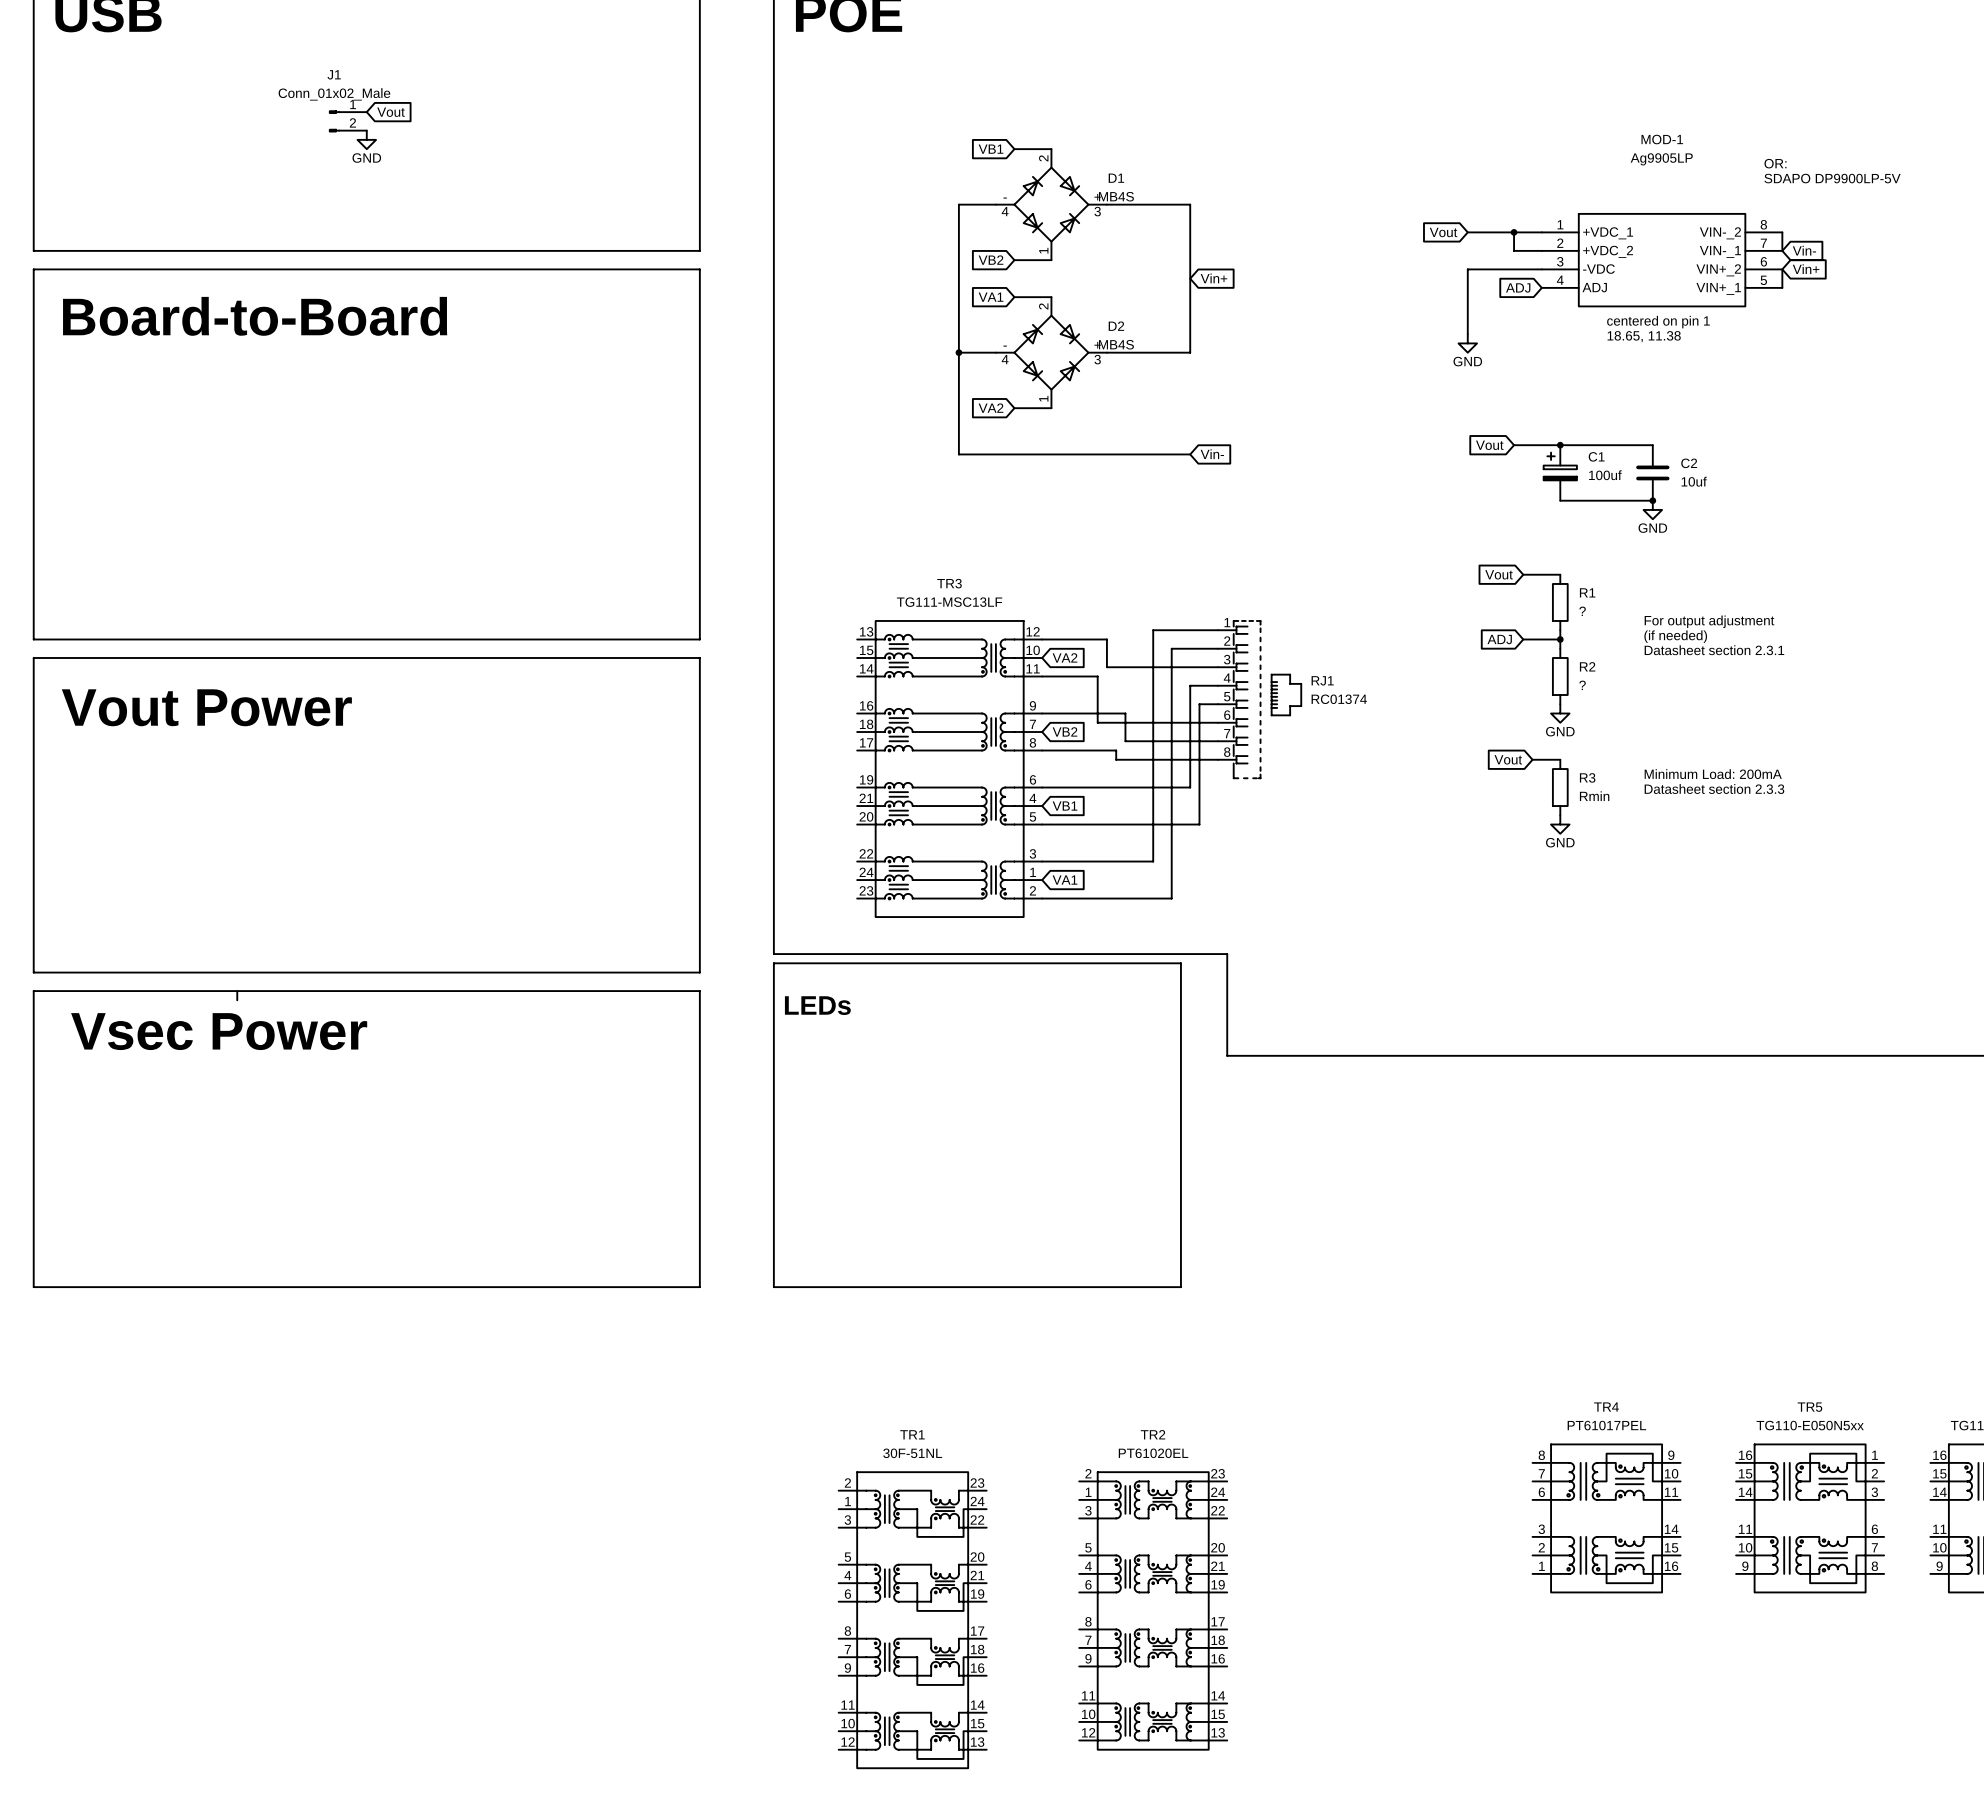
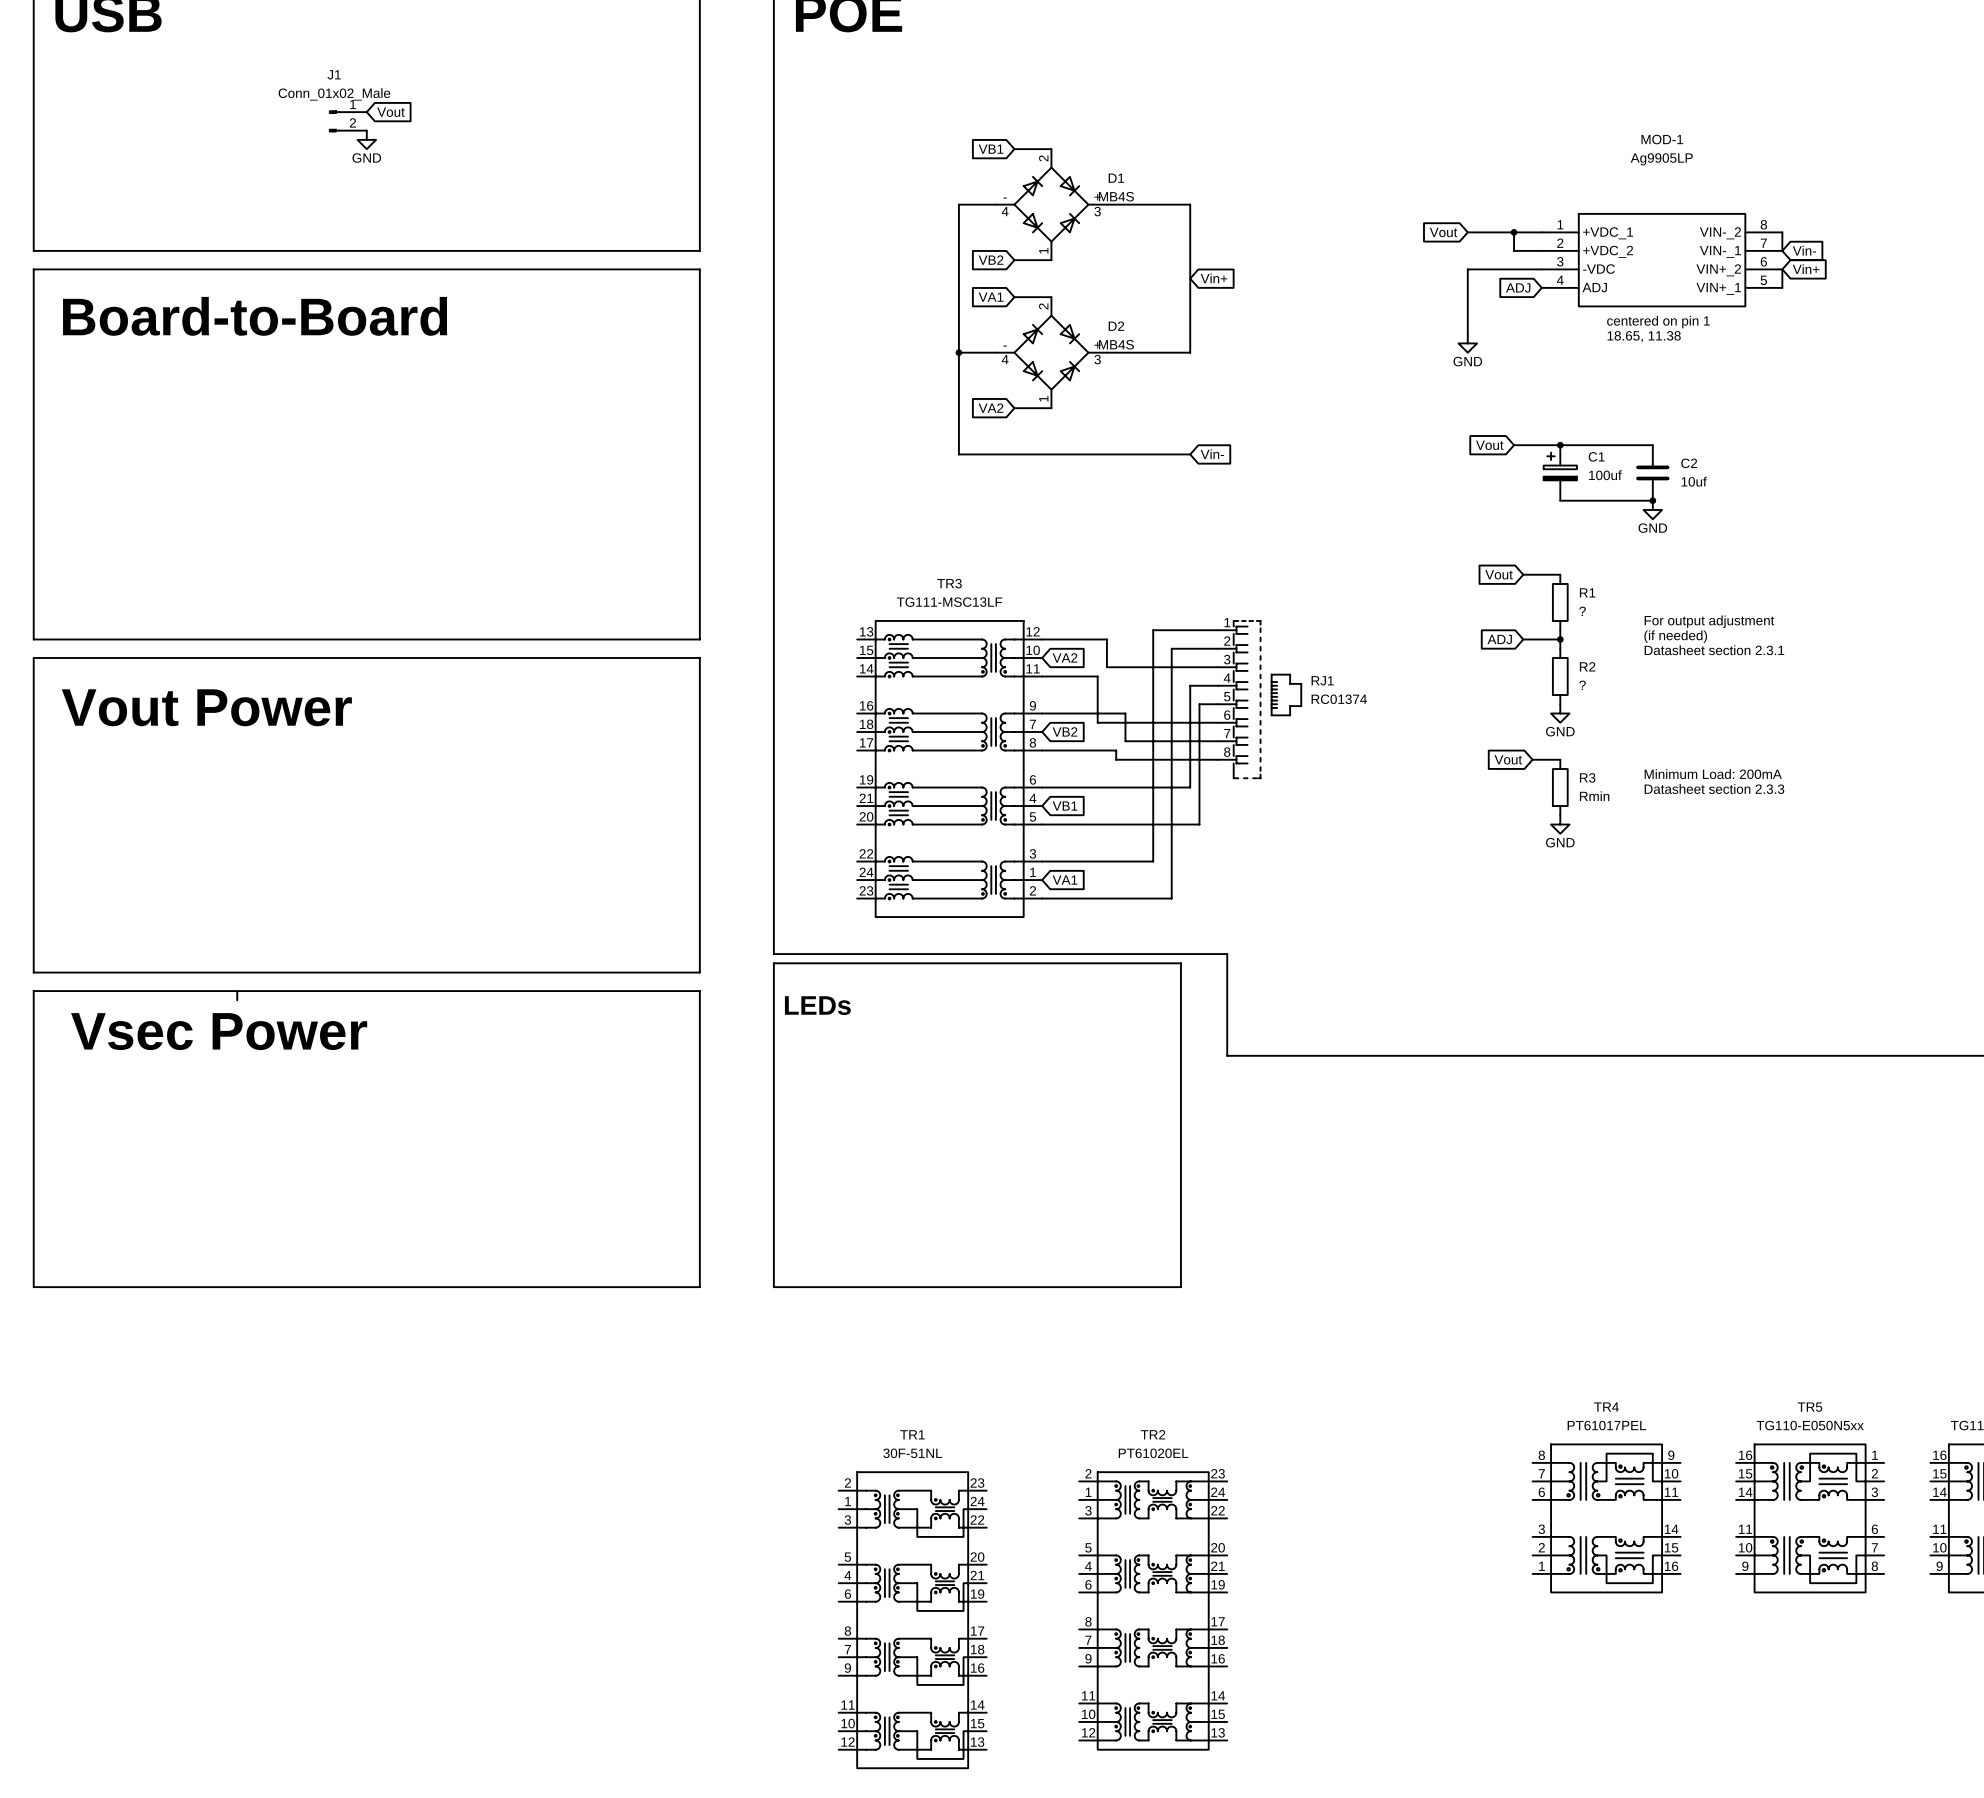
text: OR: (1775, 163) -> none
text: SDAPO DP9900LP-5V (1832, 178) -> none

